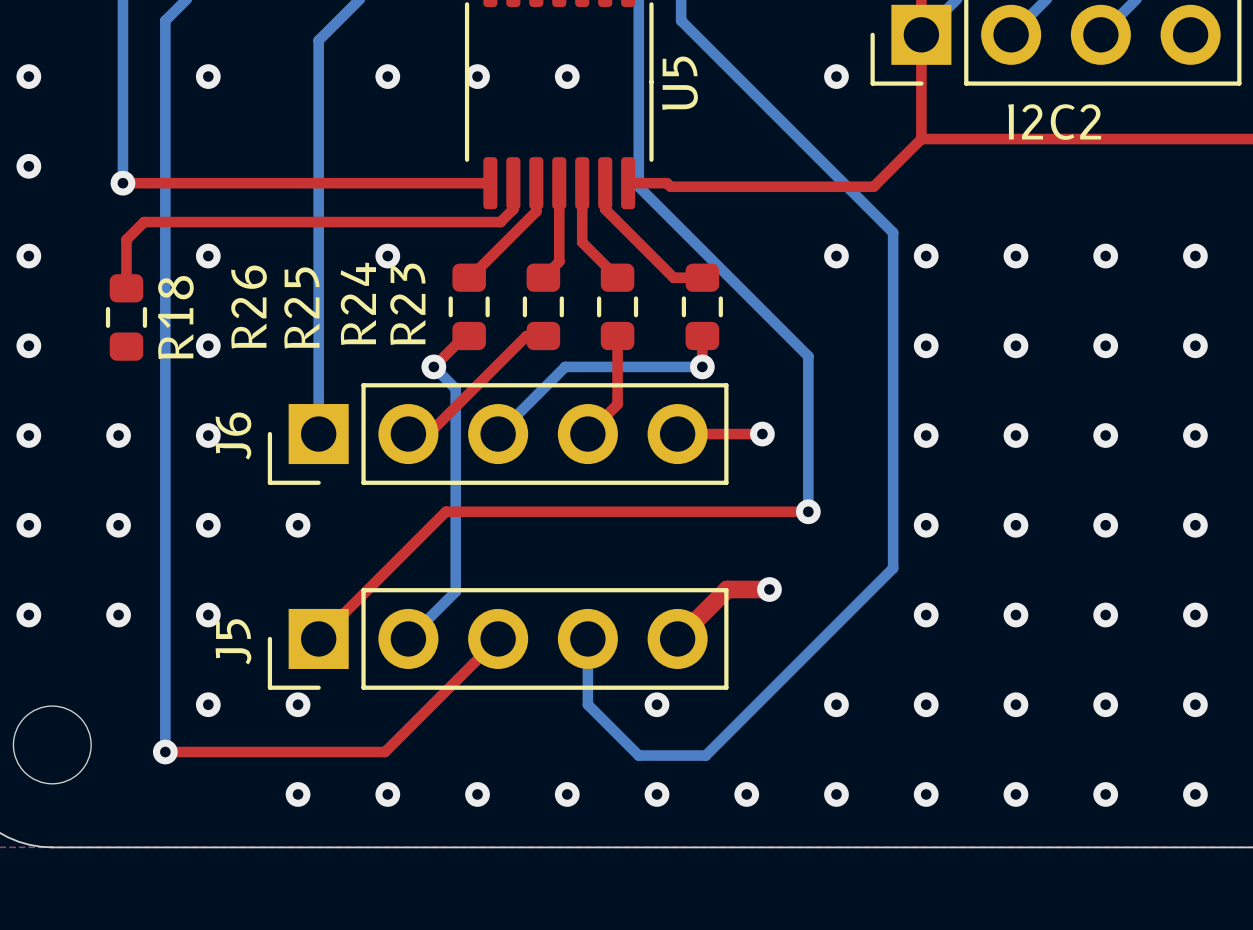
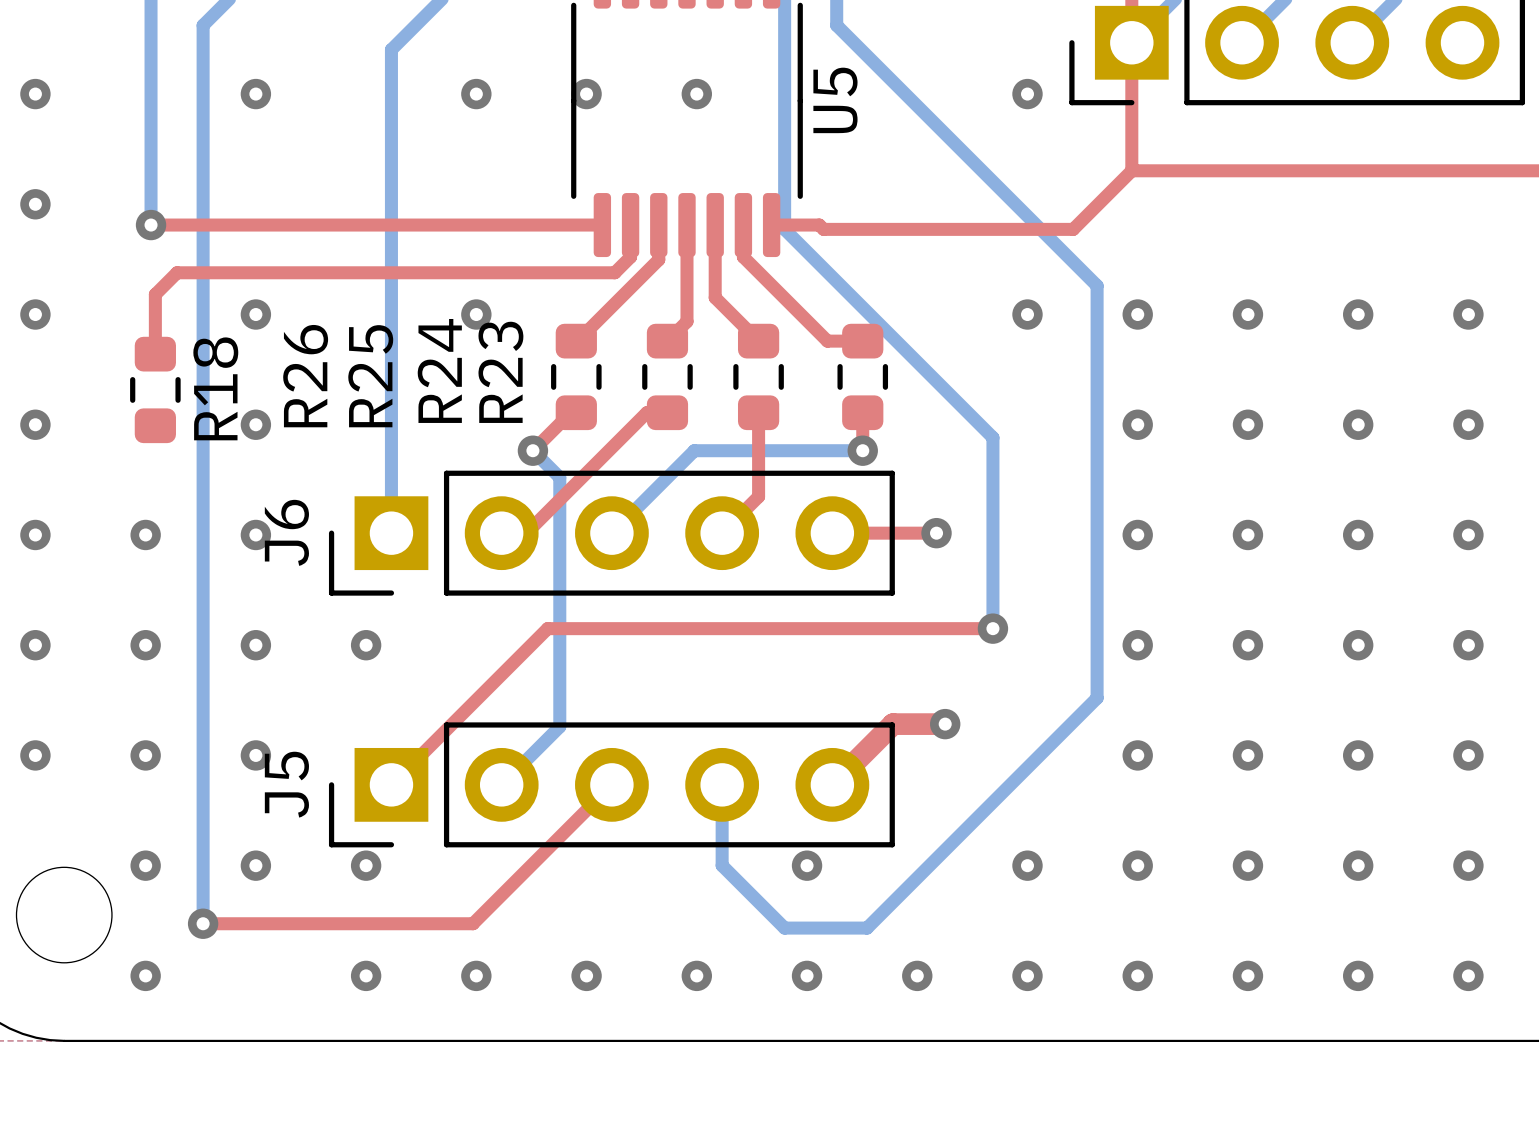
text: I2C2 (1054, 122) -> none
via: none -> (145, 865)
via: none -> (145, 975)

